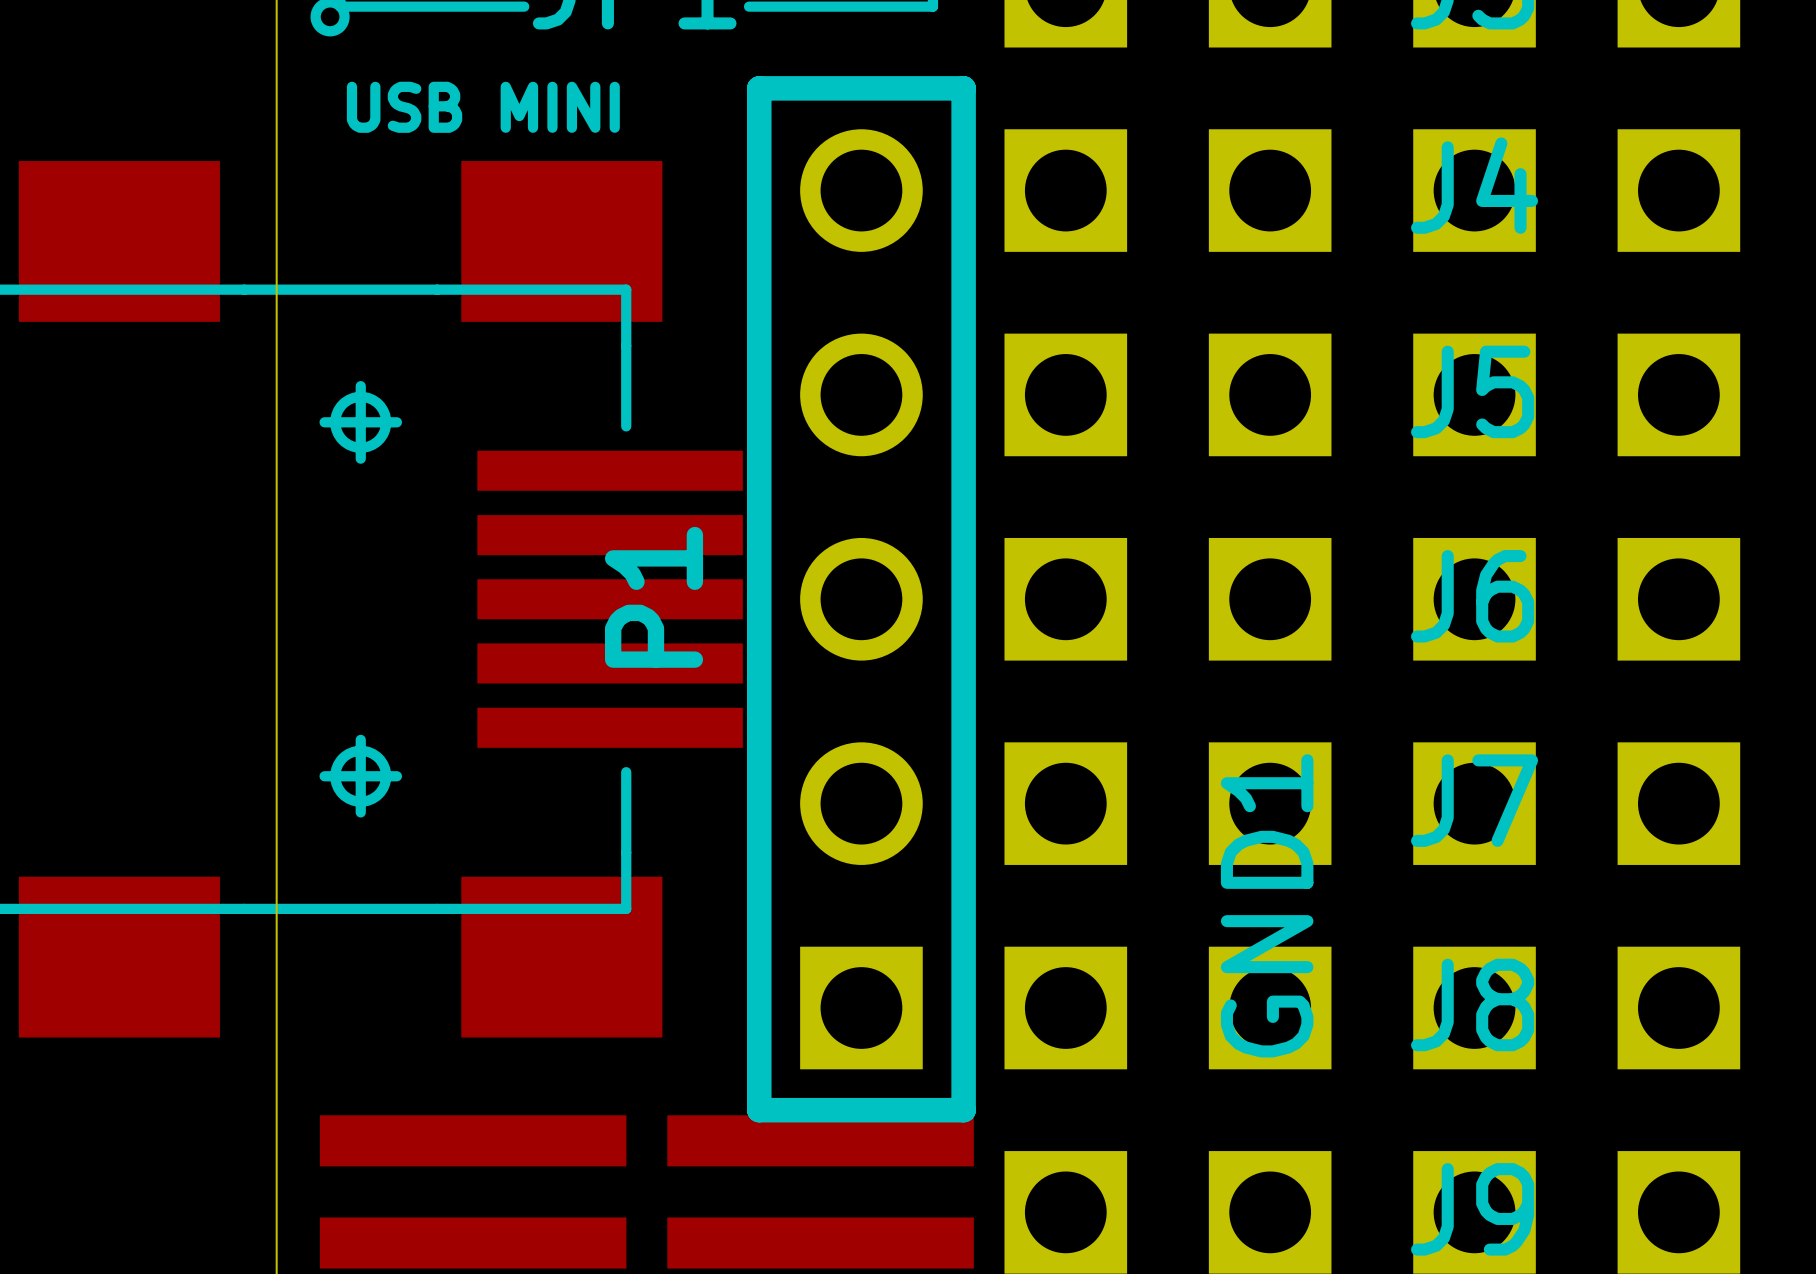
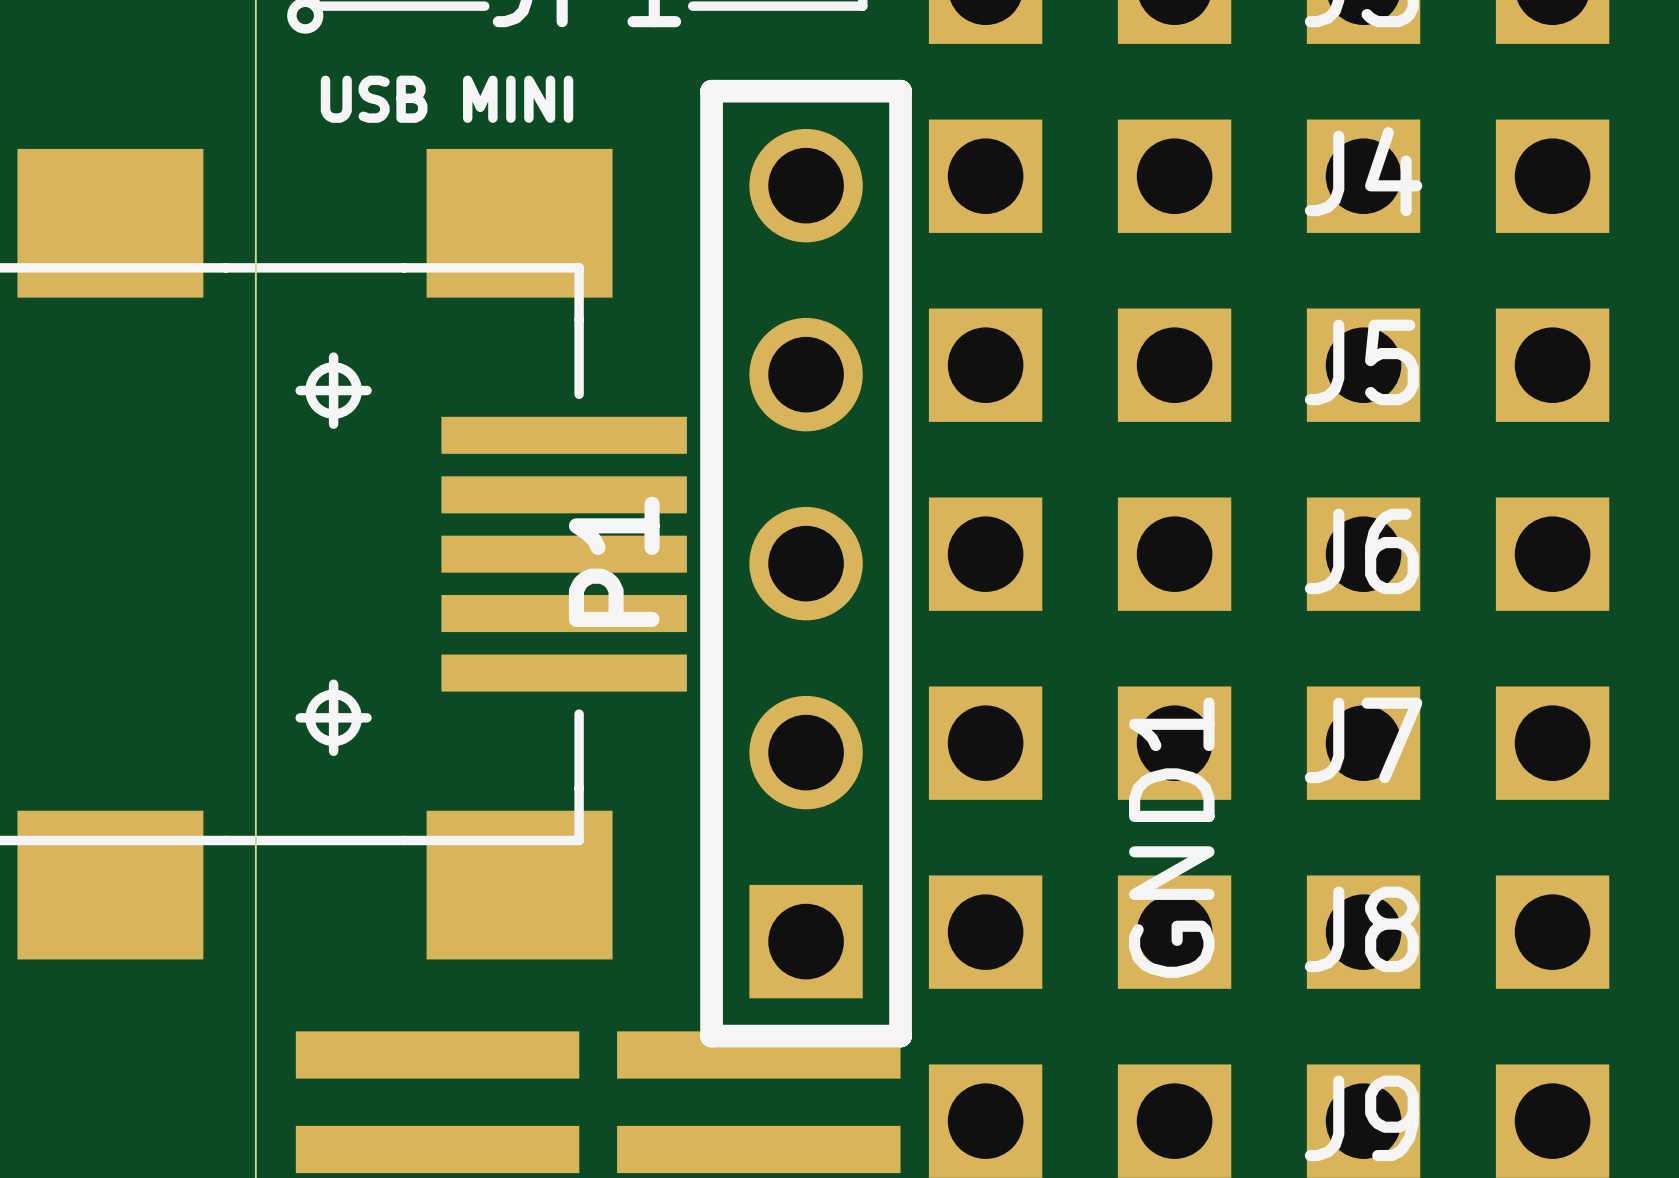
P1 position: (861, 599) -> (806, 563)

